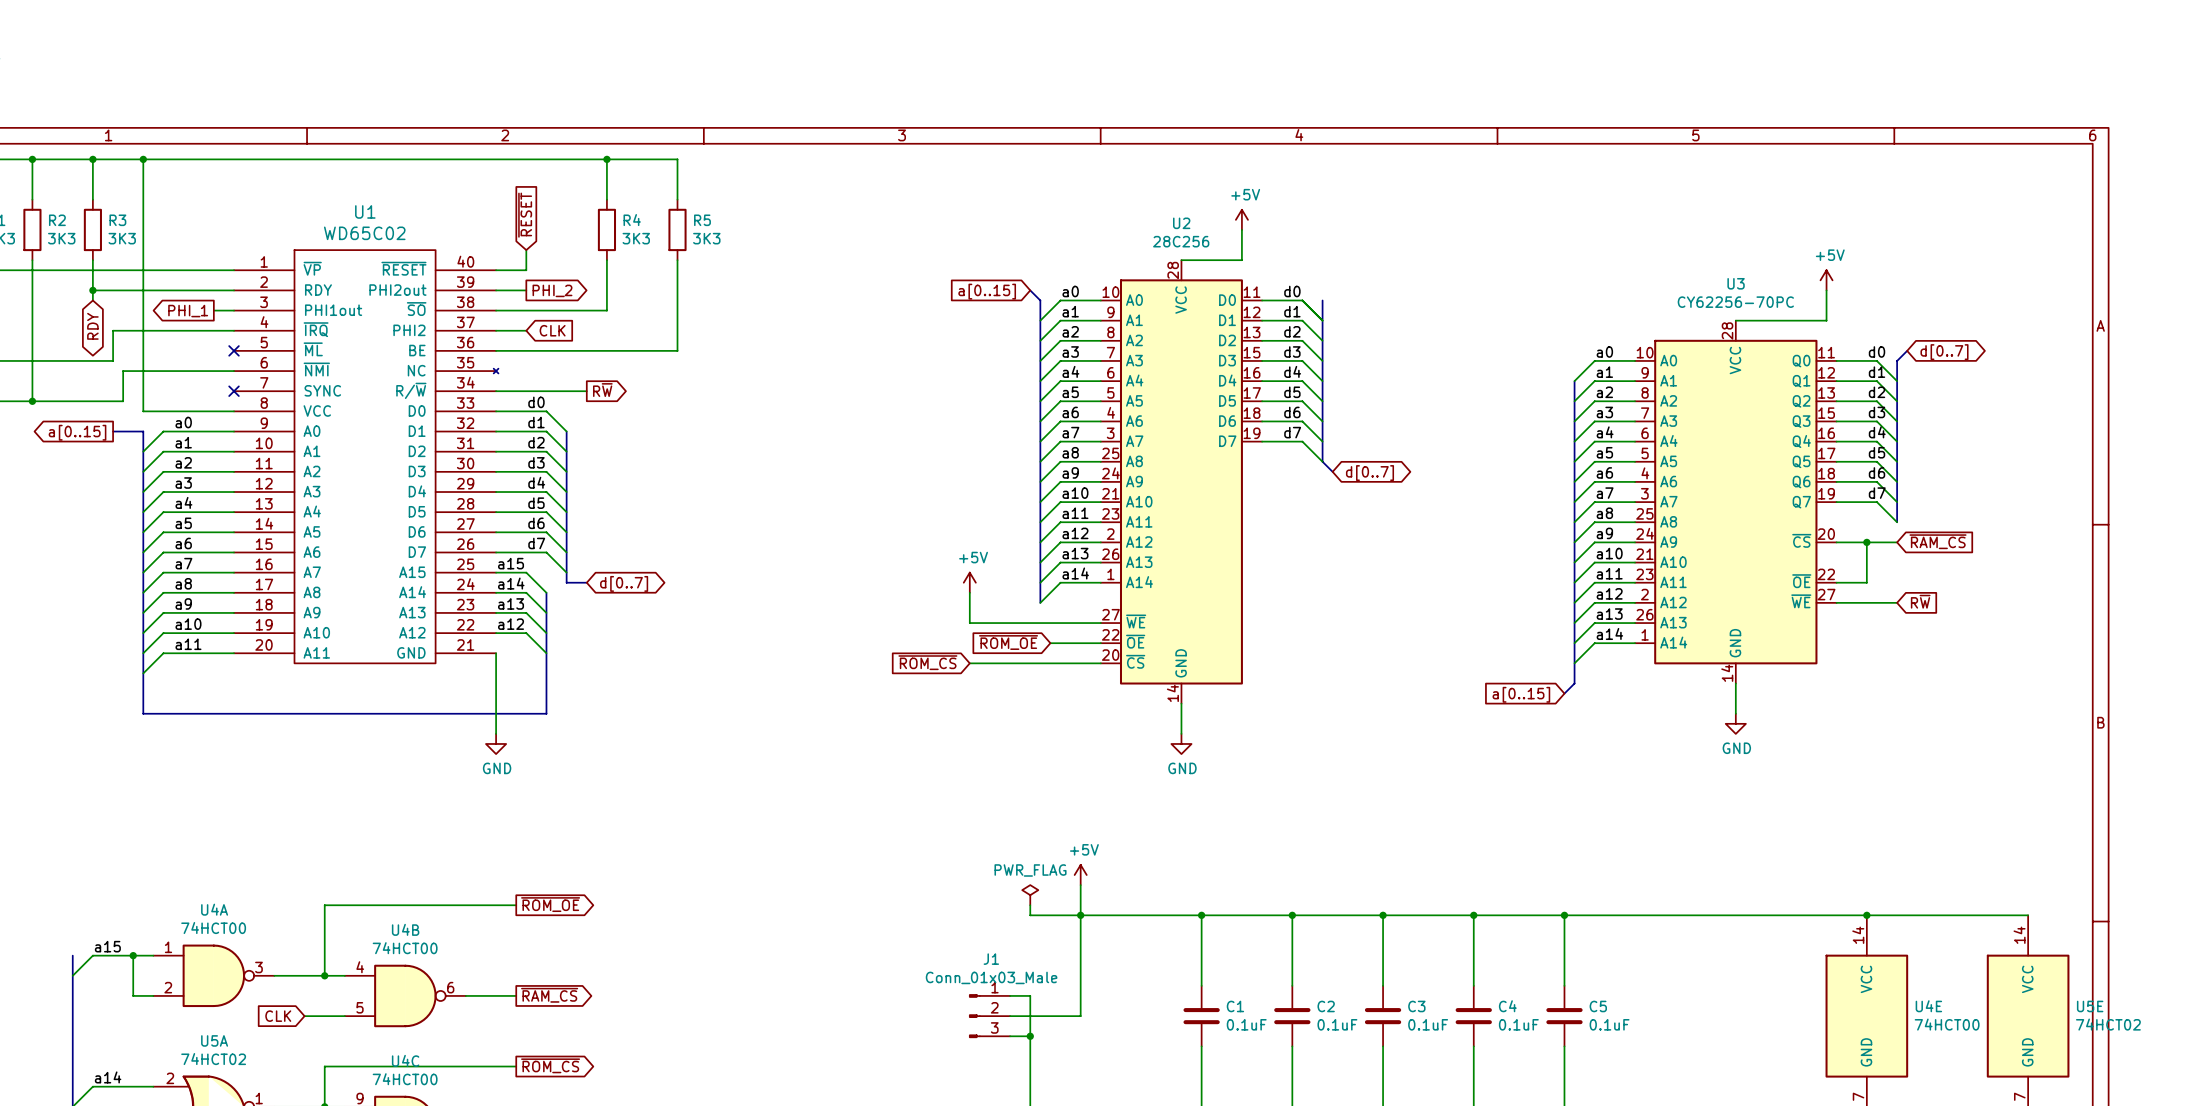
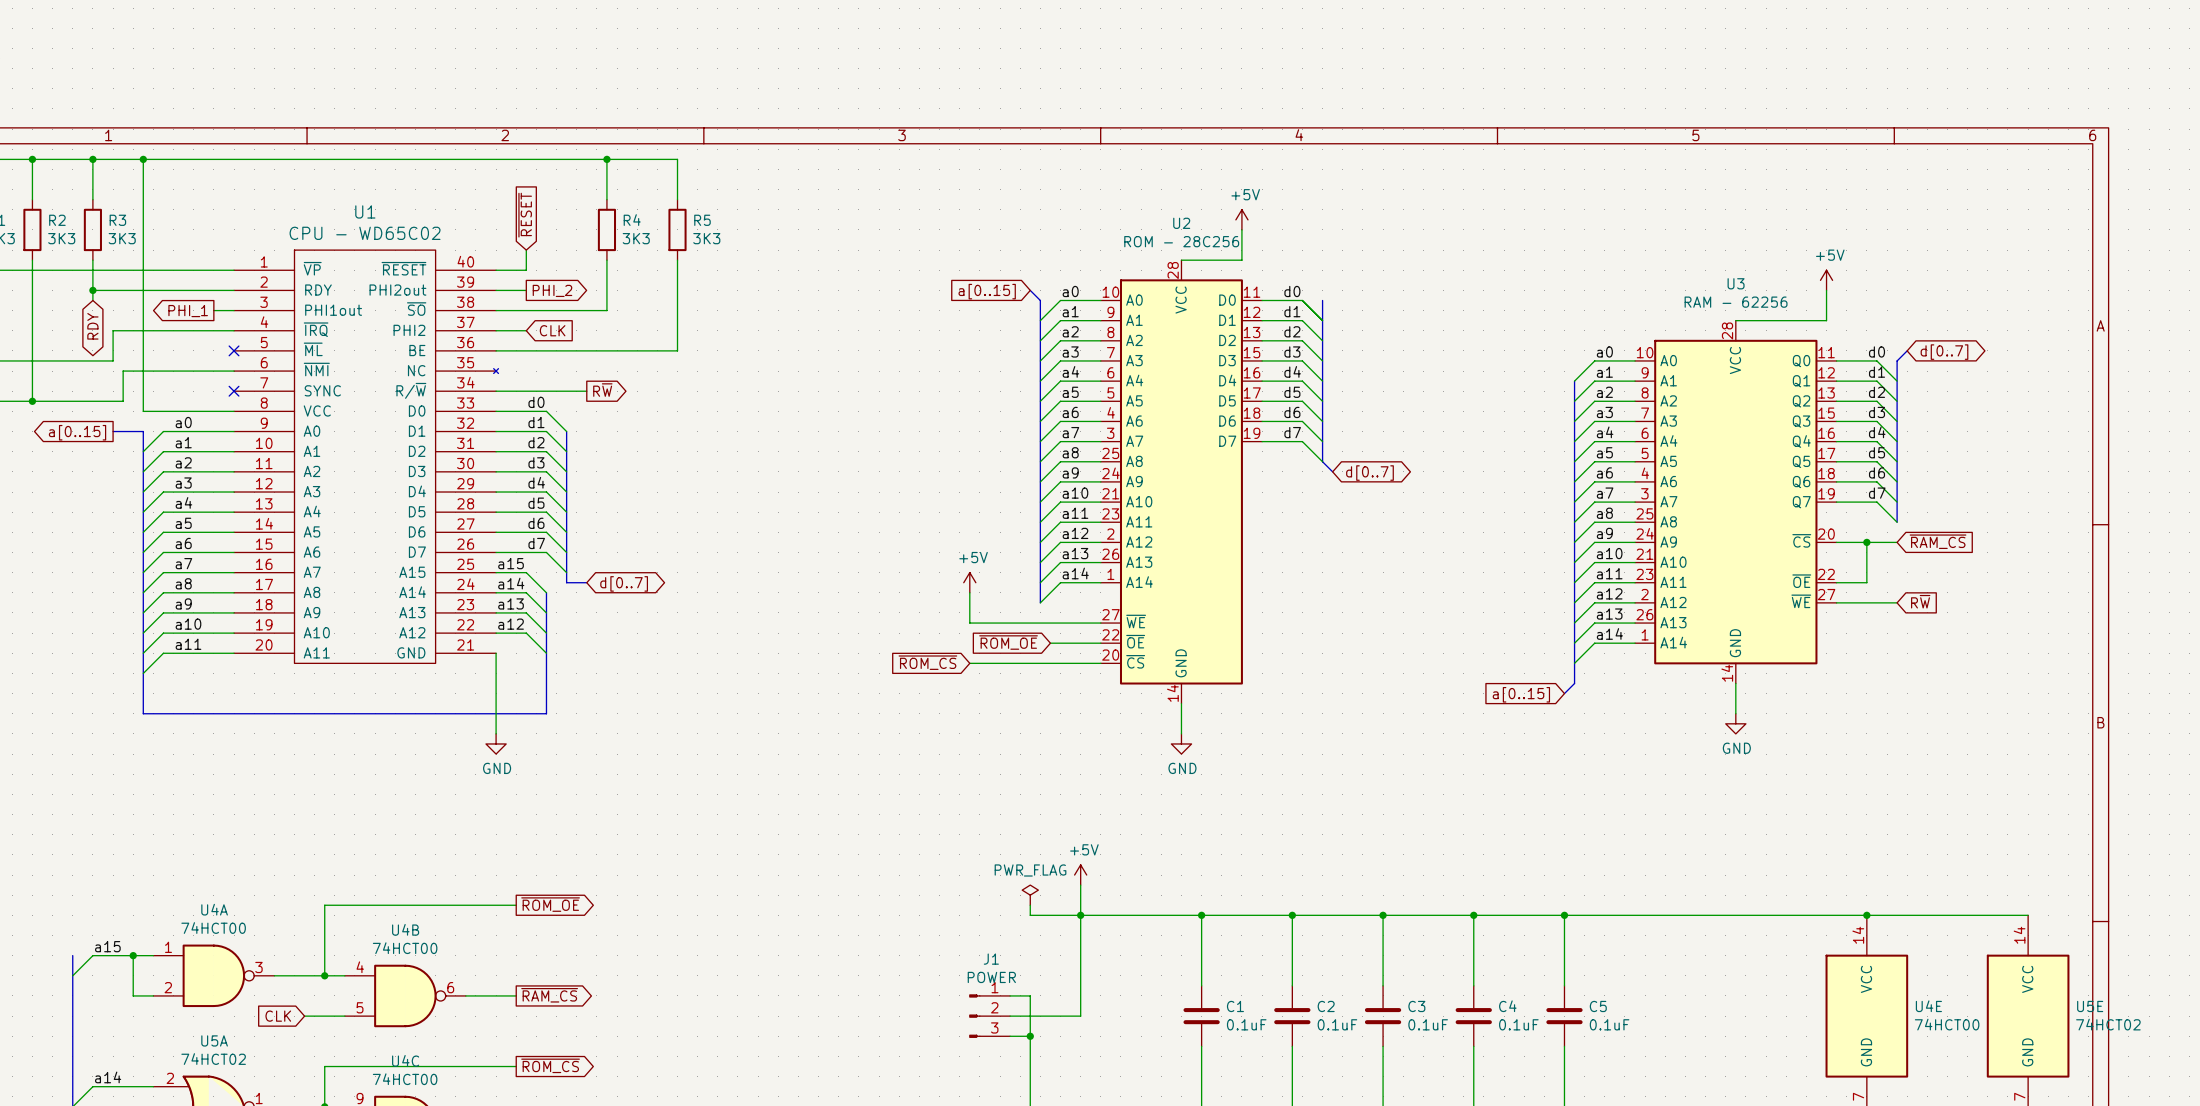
U1 value: WD65C02 (364, 233) -> CPU - WD65C02 (365, 233)
U2 value: 28C256 (1181, 241) -> ROM - 28C256 (1181, 241)
U3 value: CY62256-70PC (1735, 302) -> RAM - 62256 (1736, 302)
J1 value: Conn_01x03_Male (991, 977) -> POWER (991, 977)

